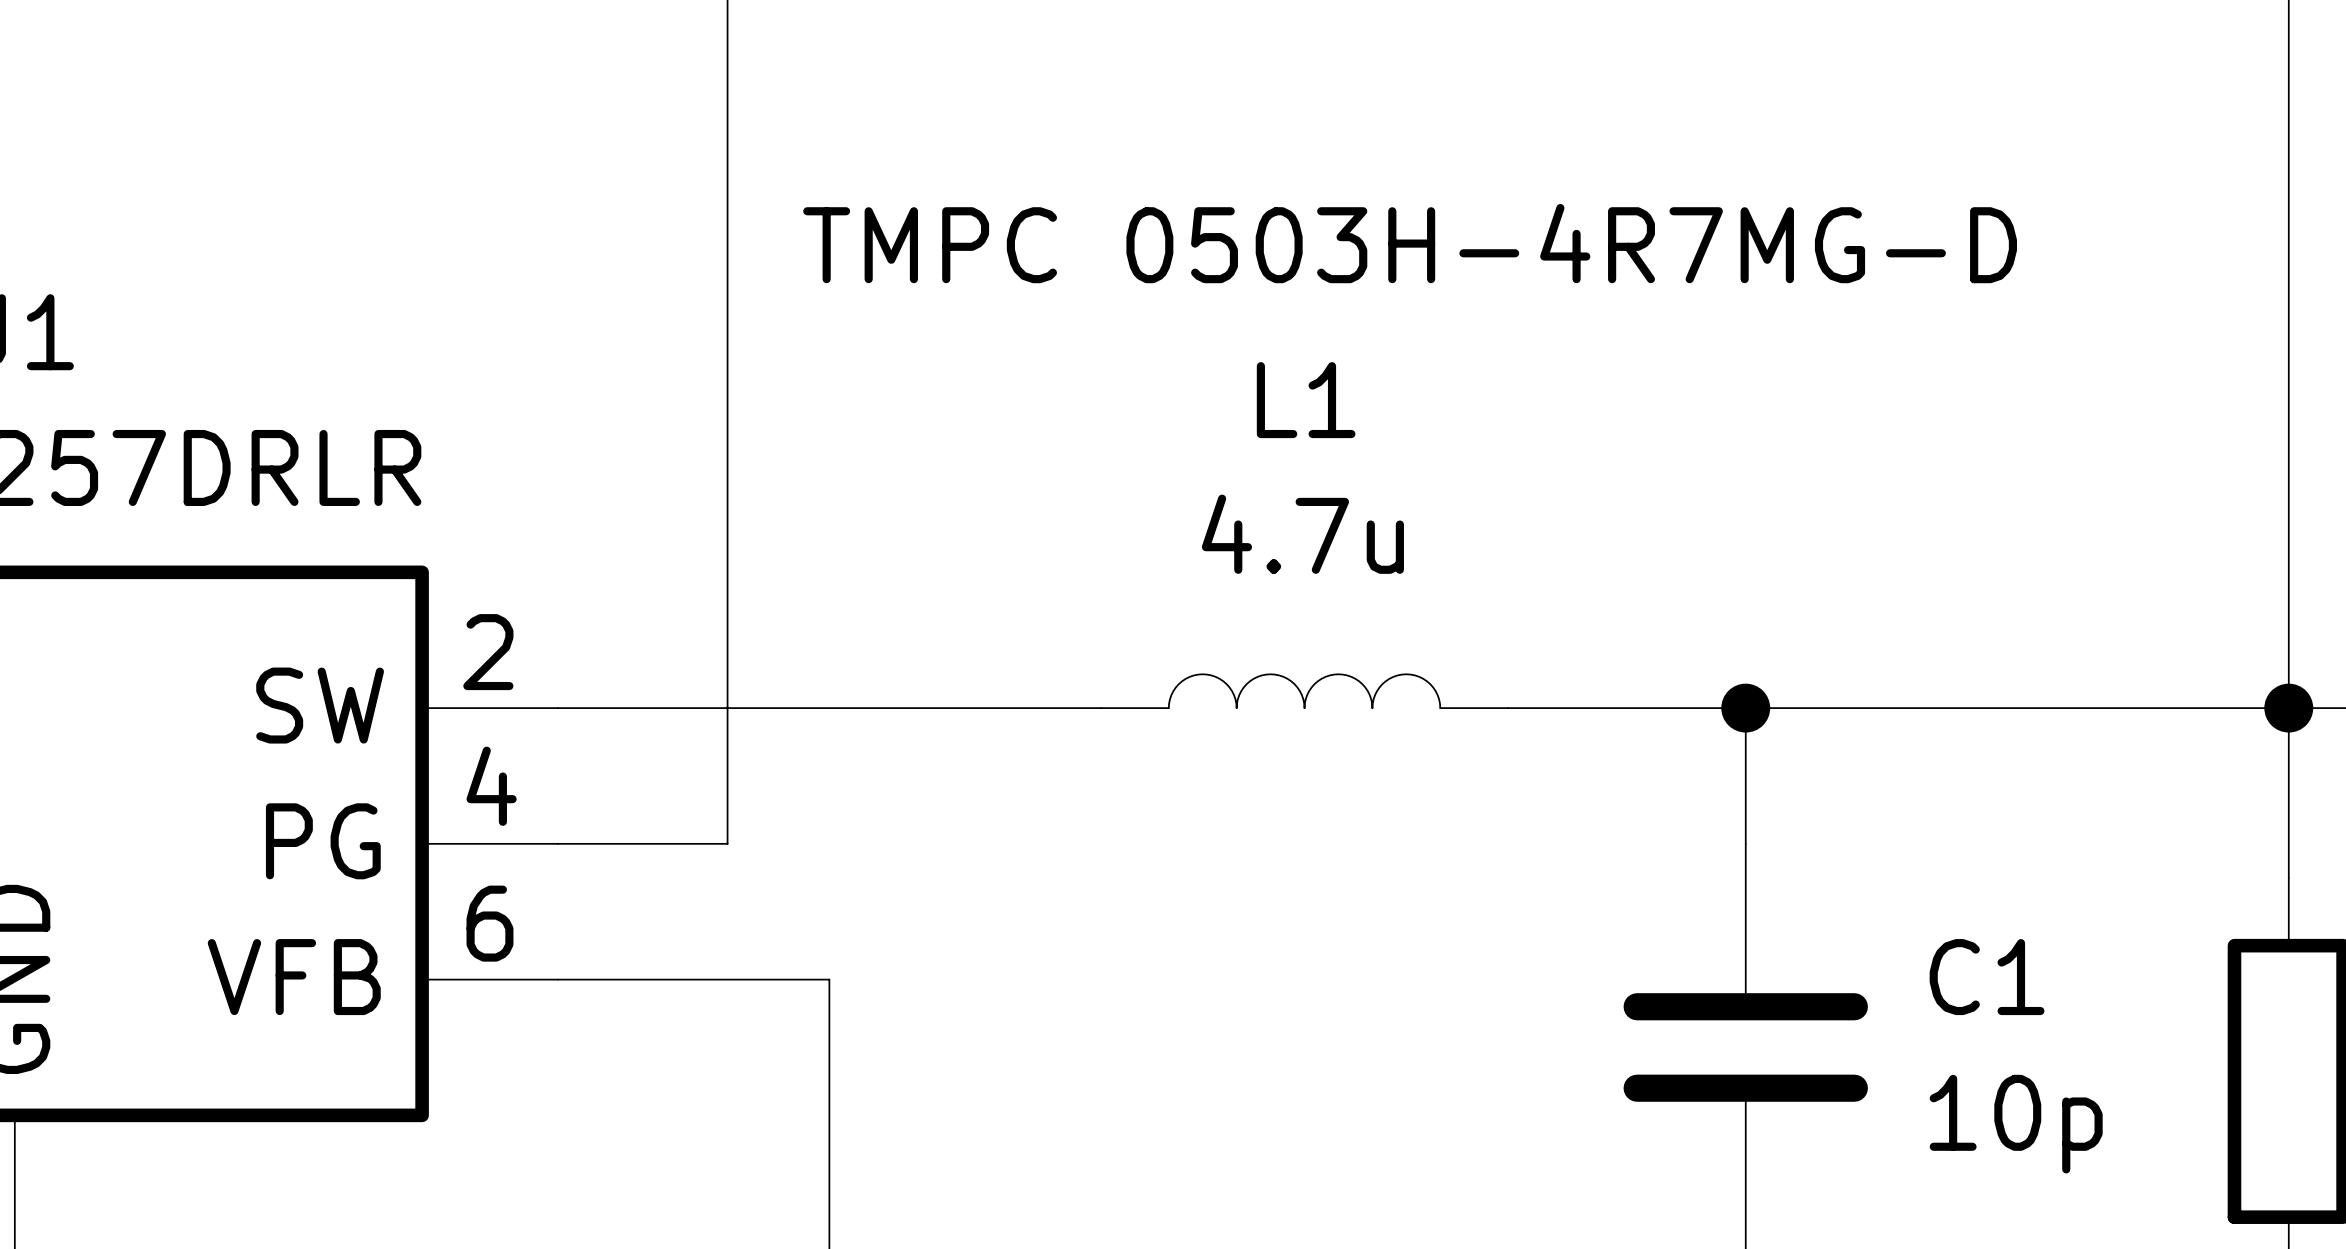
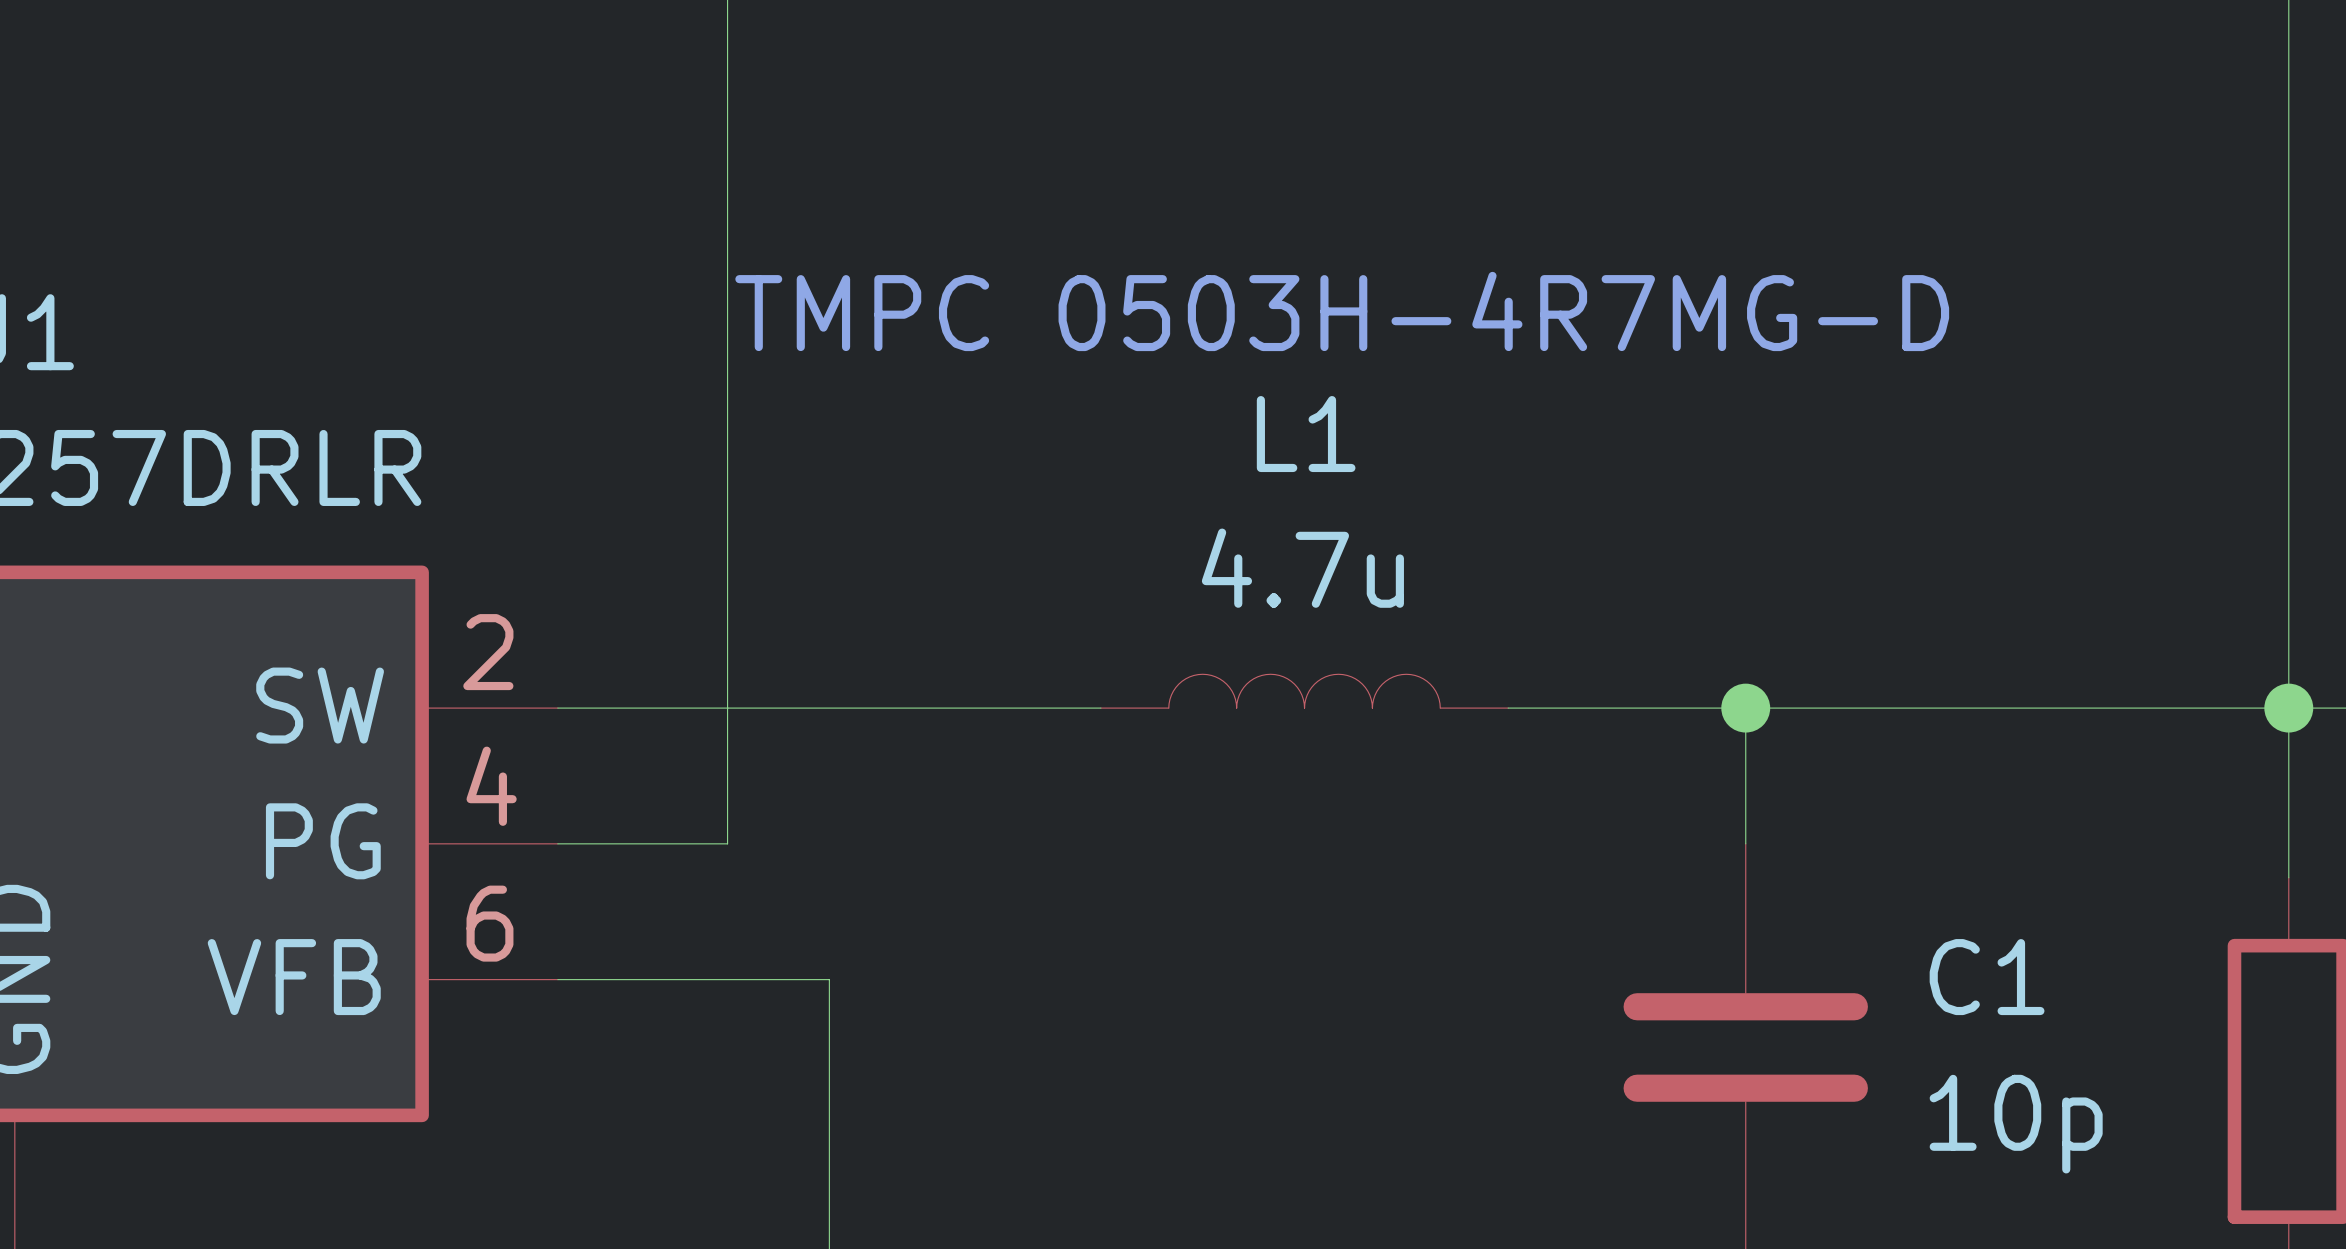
text position: TMPC 0503H-4R7MG-D (1410, 243) -> TMPC 0503H-4R7MG-D (1342, 311)
L1 name position: L1 (1306, 400) -> L1 (1306, 434)
L1 value position: 4.7u (1302, 534) -> 4.7u (1302, 568)

